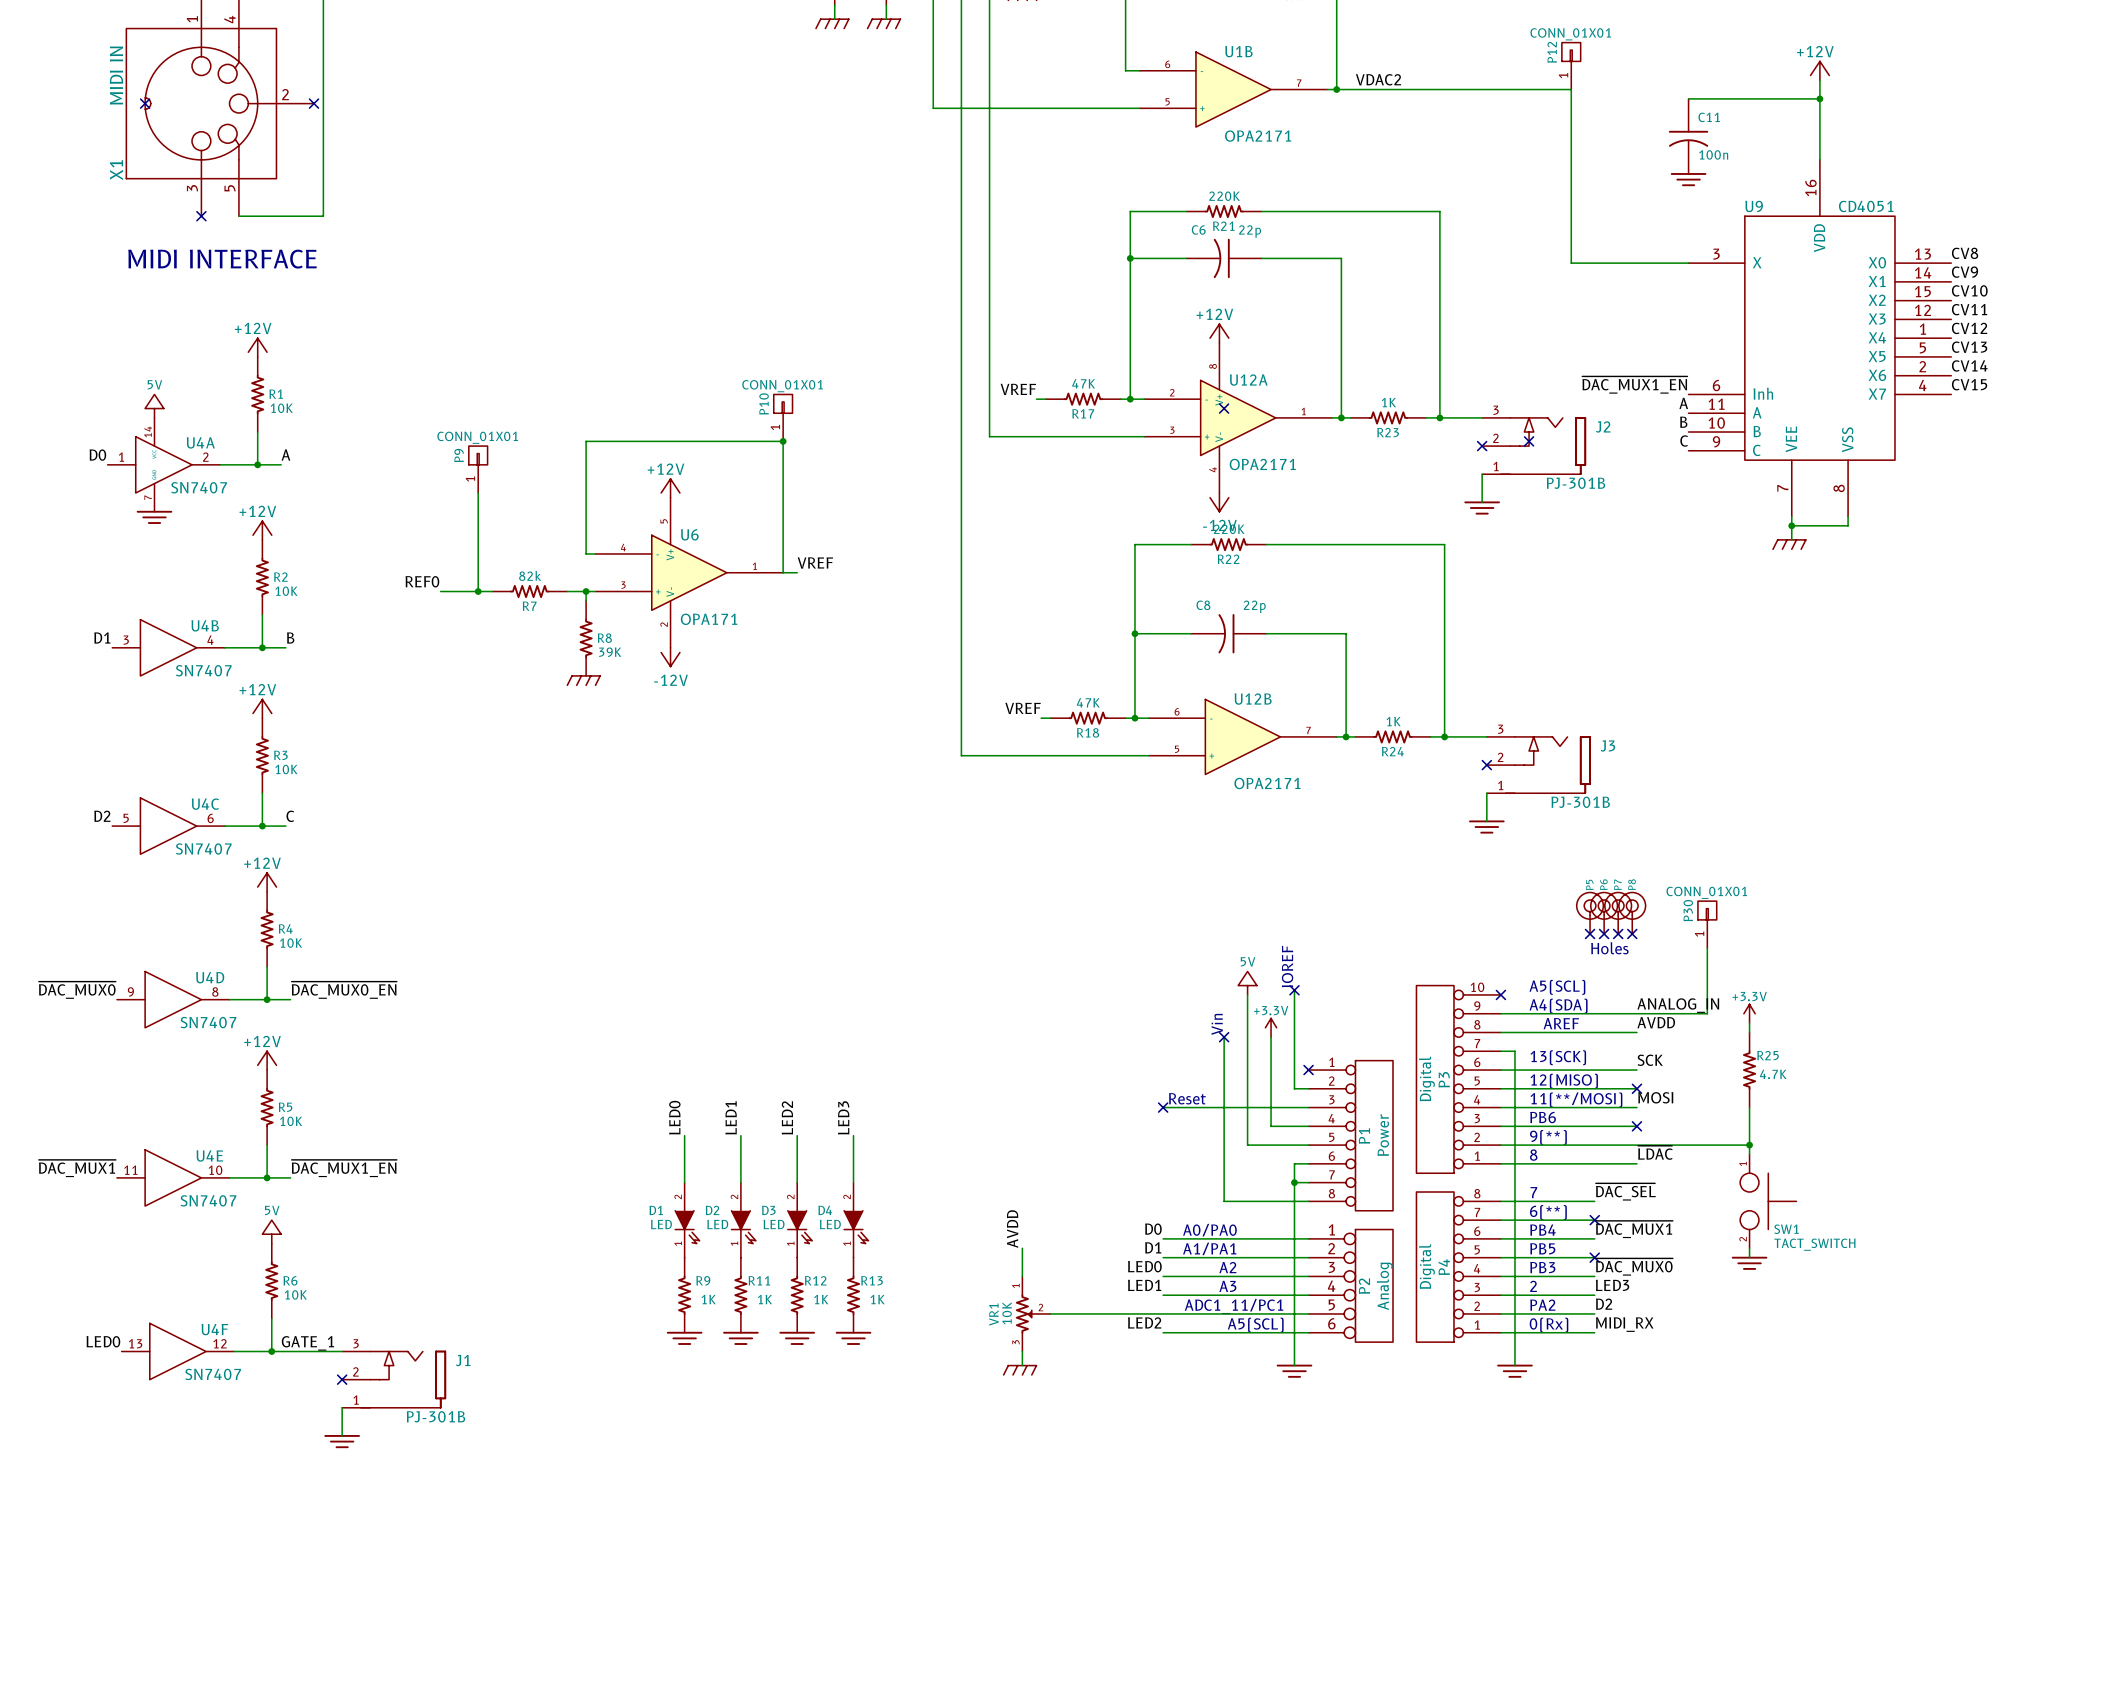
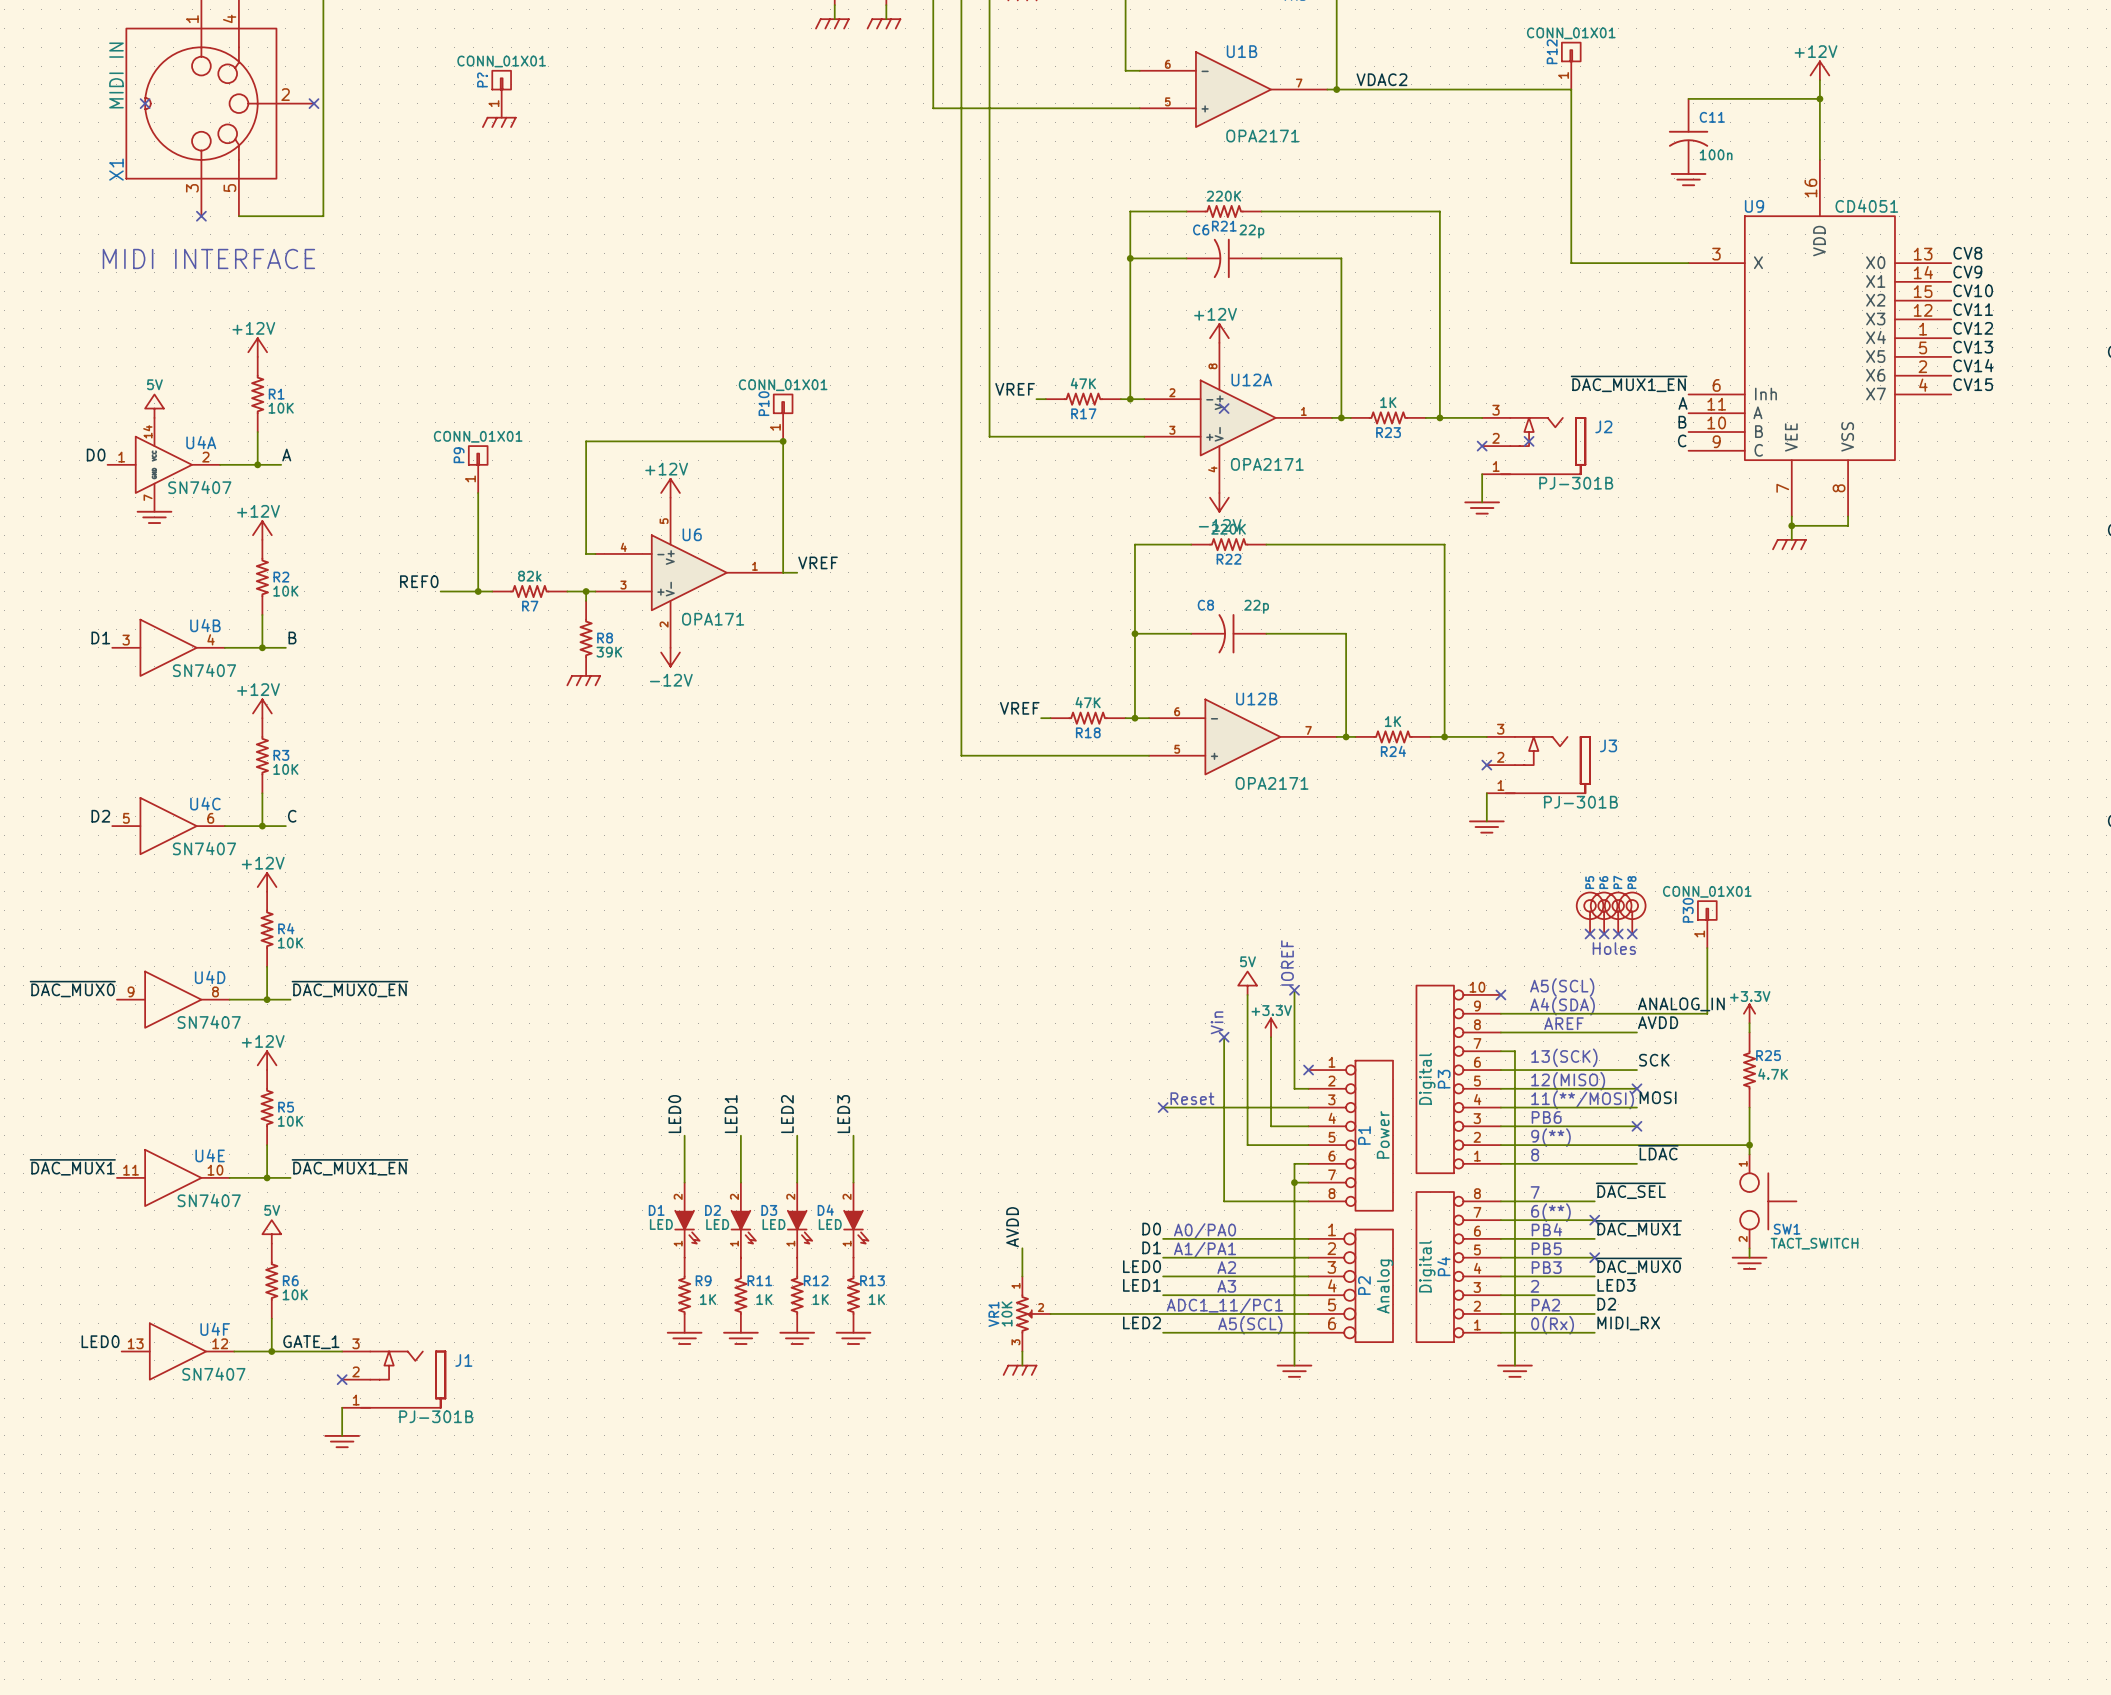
P?: none -> CONN_01X01 (501, 94)
power symbol: none -> (499, 122)

